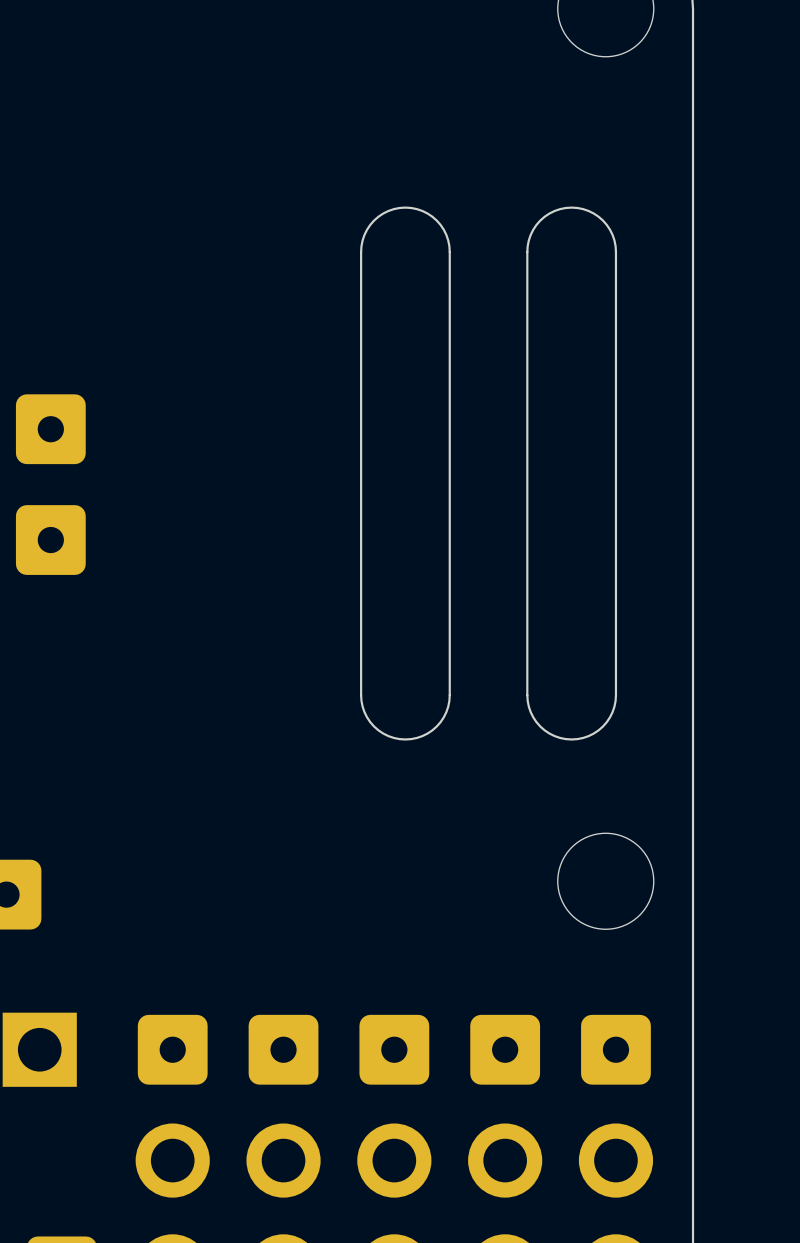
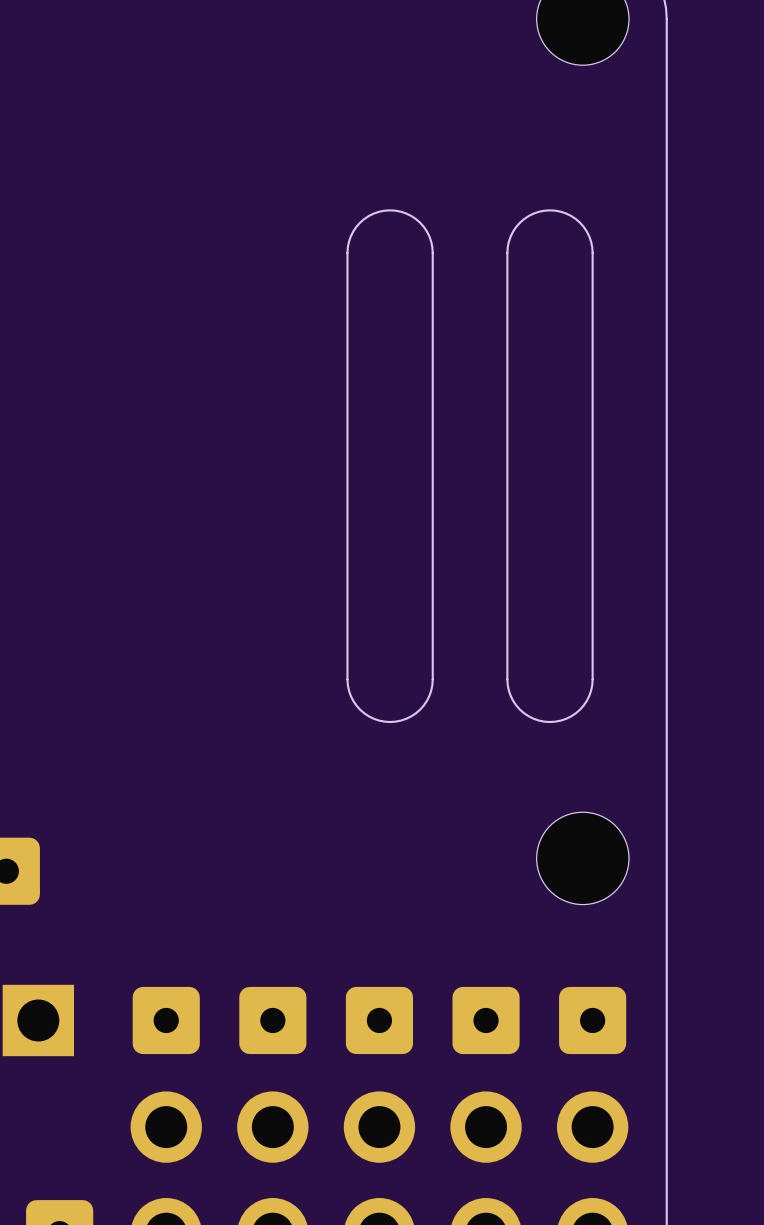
part: (50, 429) -> none
part: (50, 540) -> none

